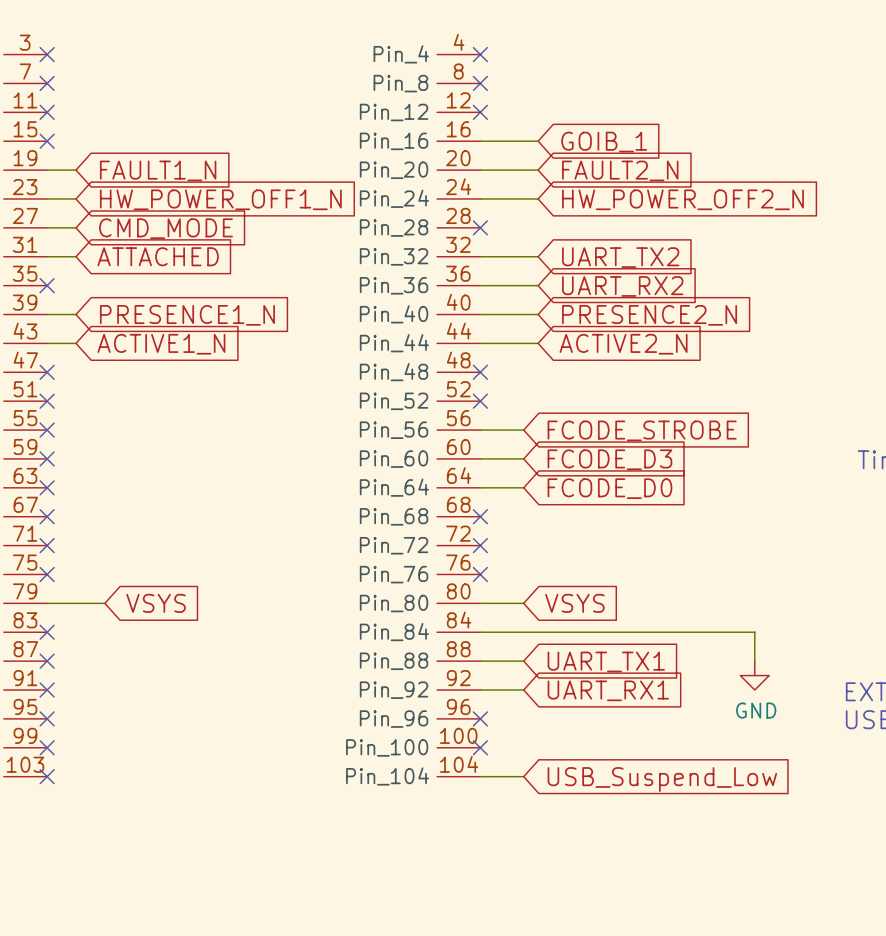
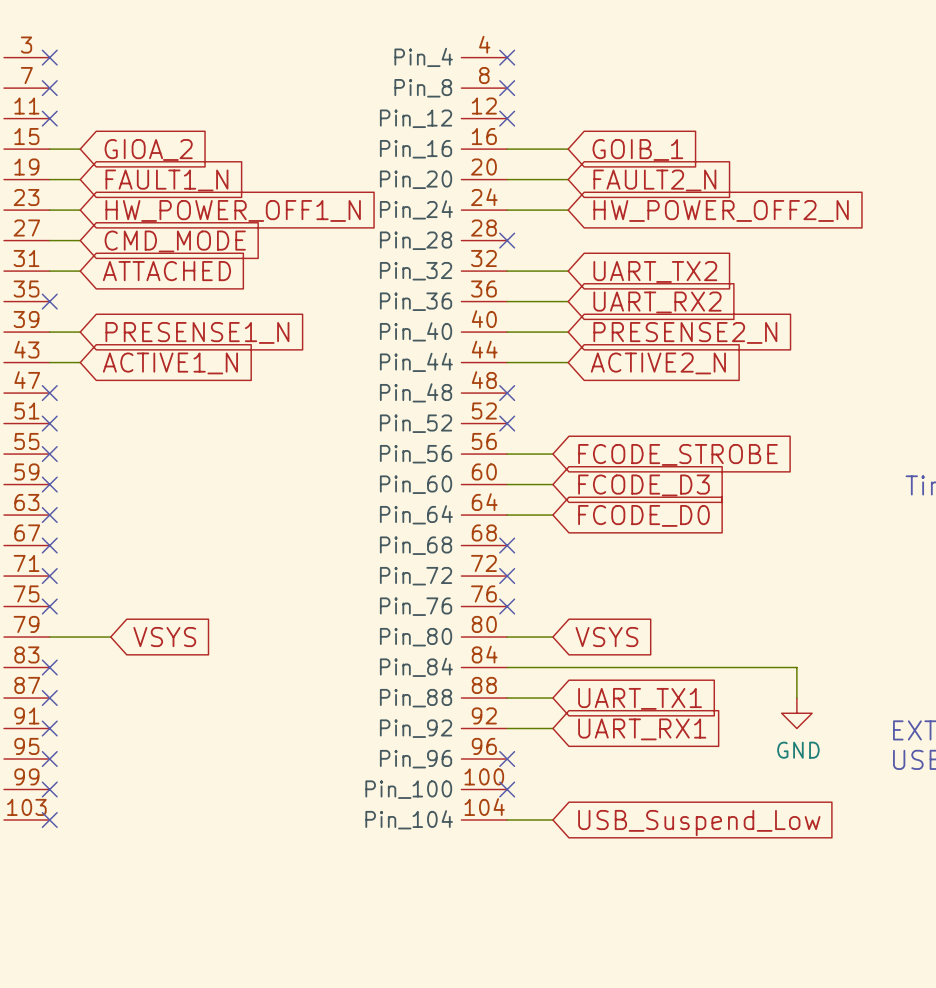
wire: none -> (49, 149) (80, 149)
no-connect mark: (47, 141) -> none
global label: none -> GIOA_2 (148, 149)
global label: PRESENCE1_N (187, 315) -> PRESENSE1_N (197, 332)
global label: PRESENCE2_N (649, 315) -> PRESENSE2_N (685, 332)

